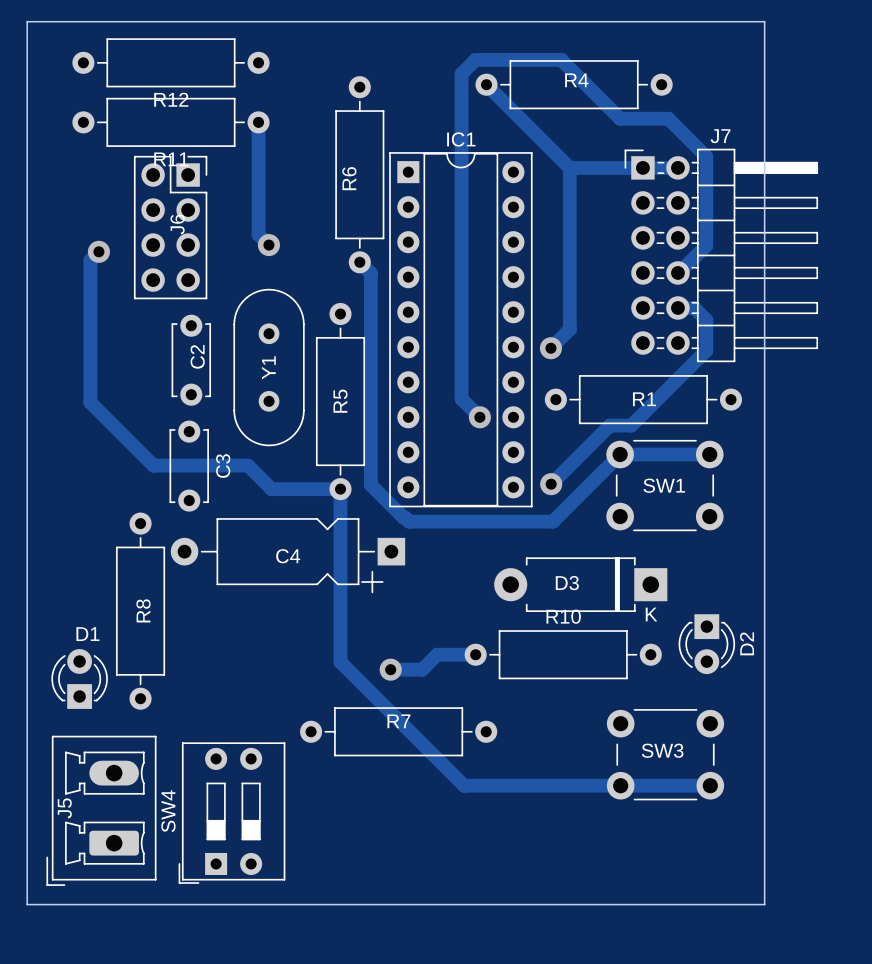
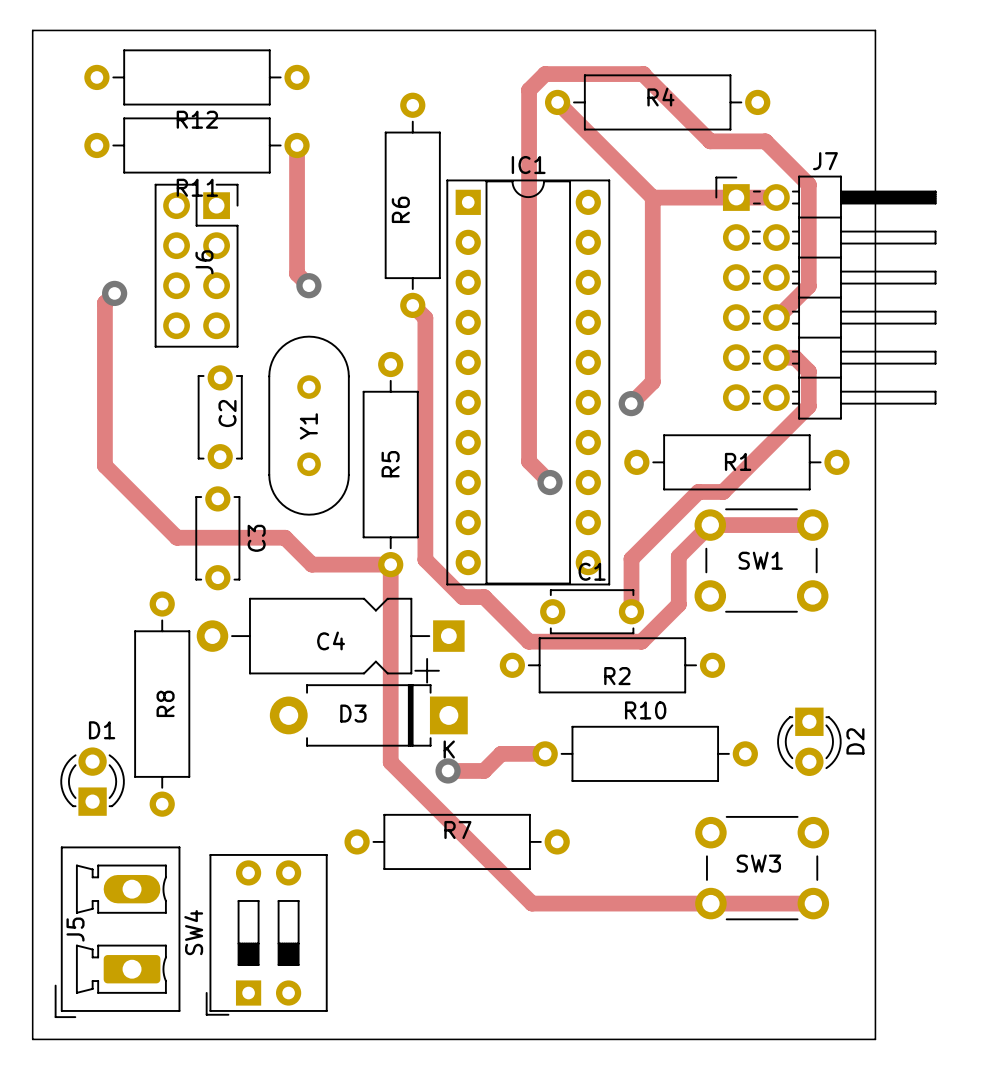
track: (592, 482) (553, 521) (409, 521) (405, 517) -> (678, 556) (678, 604) (641, 641) (528, 641) (484, 597) (464, 597)
track: none -> (631, 558) (631, 610)
via: (551, 484) -> none
C1: none -> (592, 611)
R2: none -> (612, 665)
D3 position: (580, 584) -> (368, 715)

